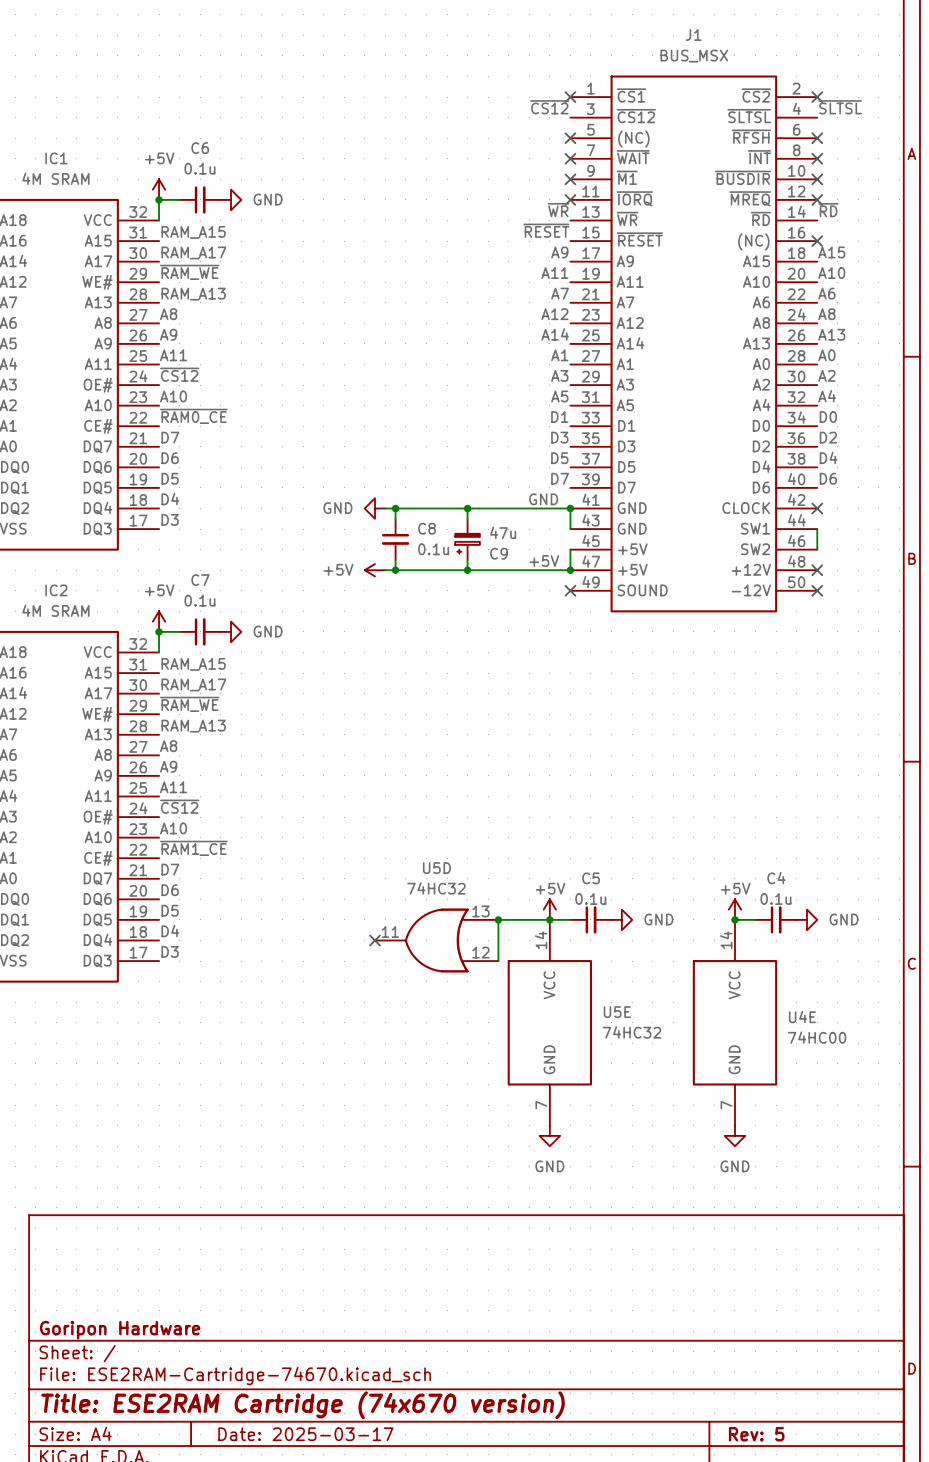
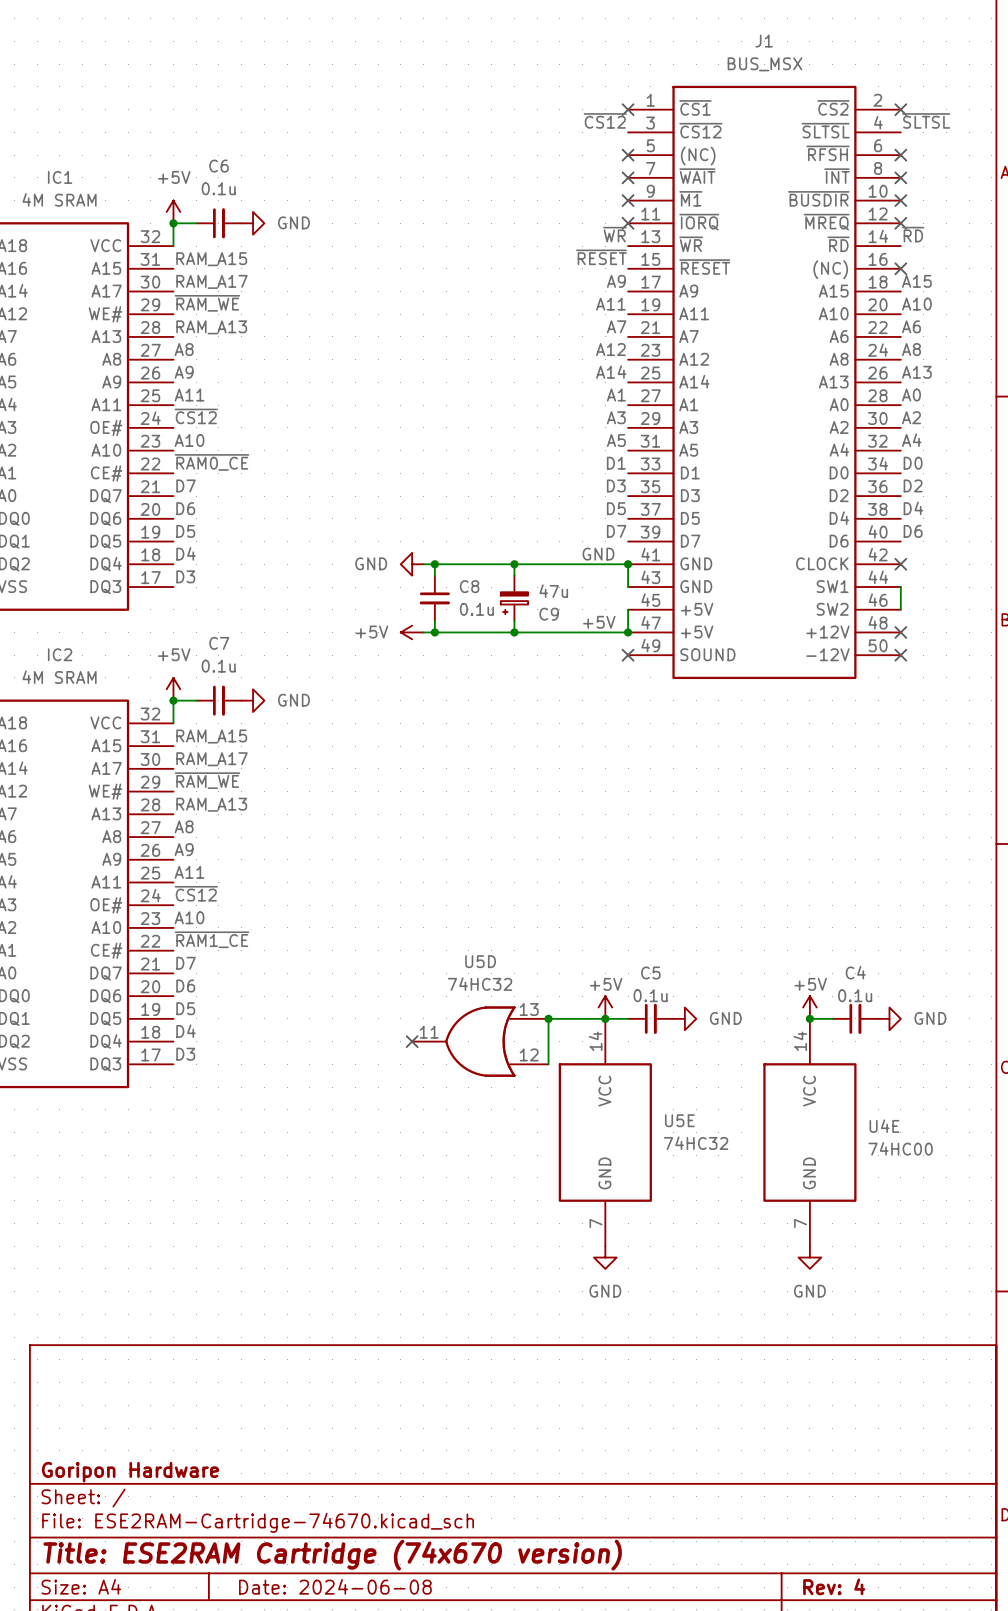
title block: Date: 2025-03-17 (305, 1434) -> Date: 2024-06-08 (335, 1586)
title block: Rev: 5 (756, 1434) -> Rev: 4 (834, 1586)

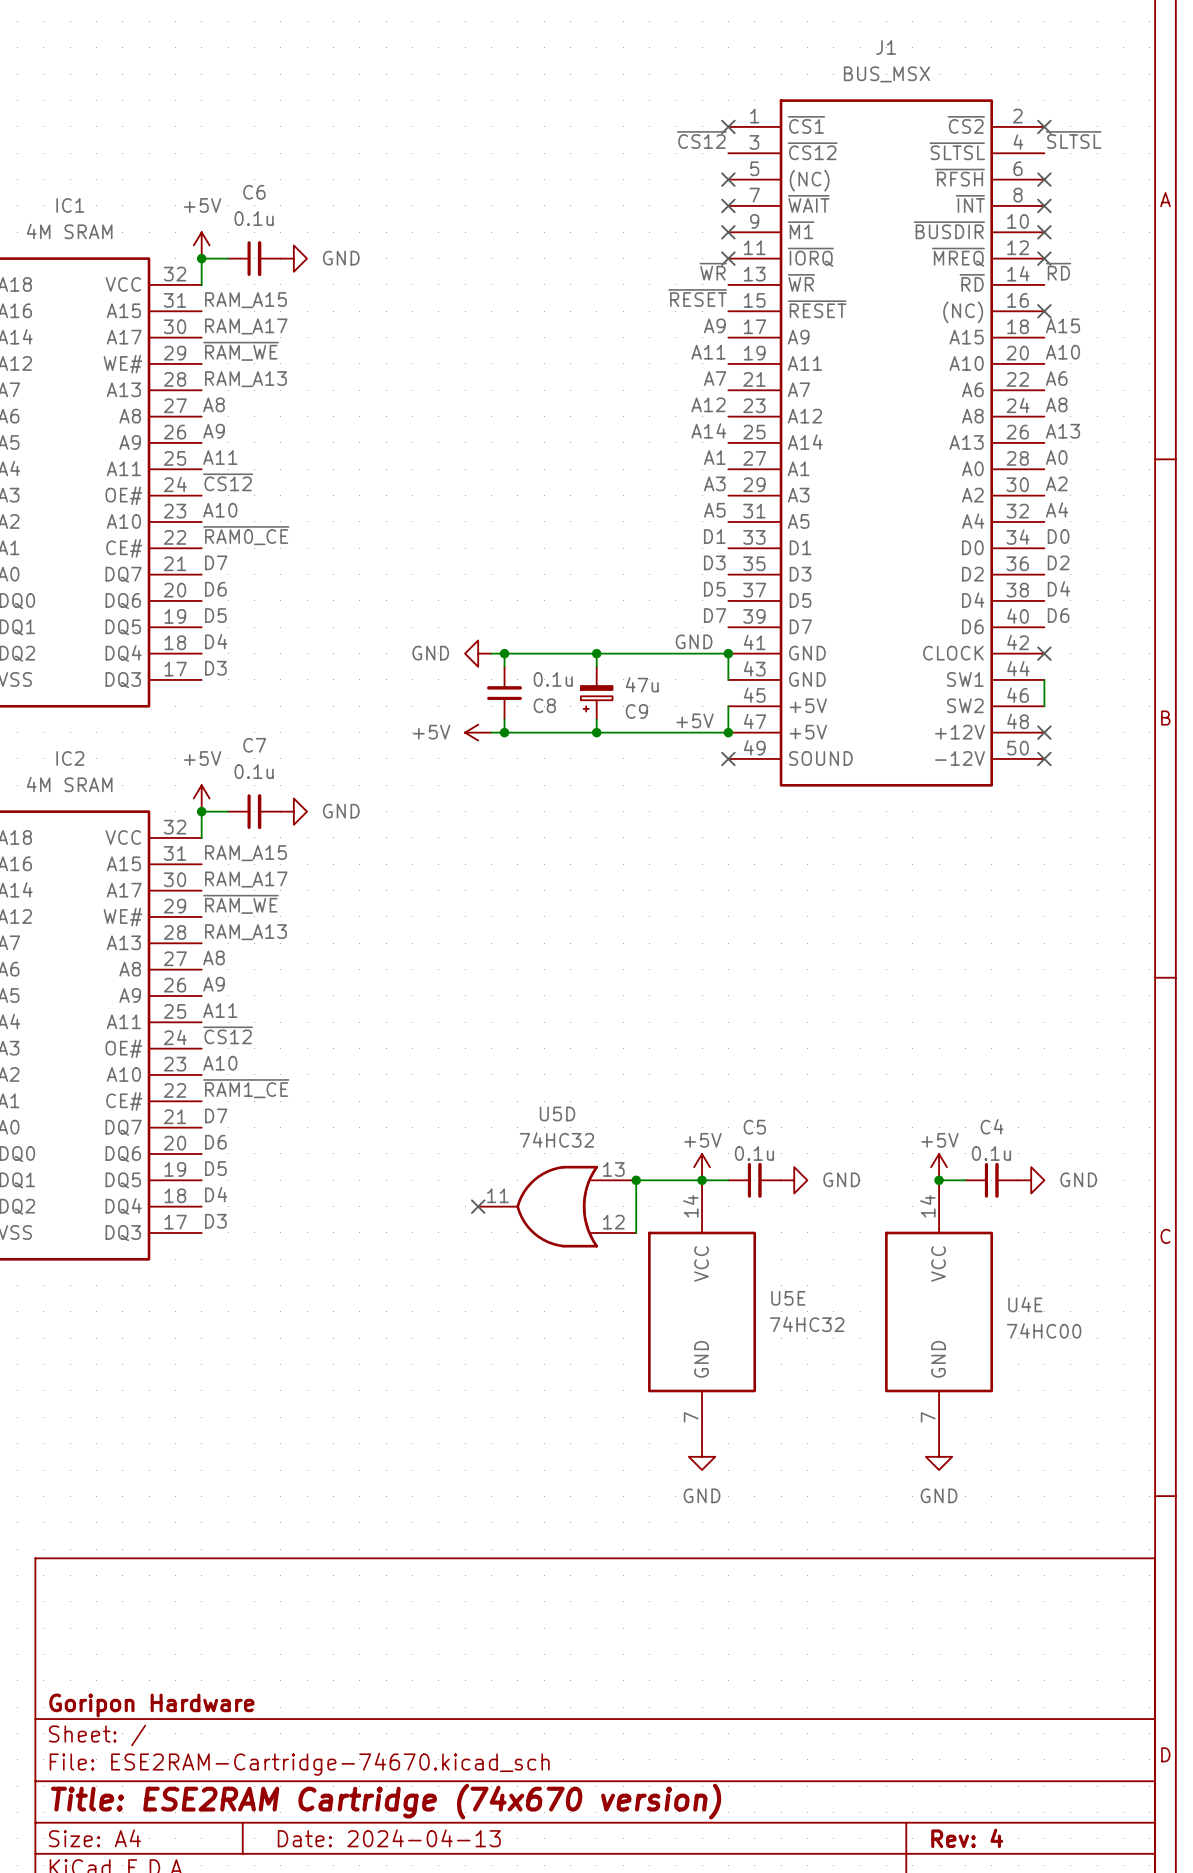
C8 name position: C8 (469, 586) -> C8 (544, 705)
C8 rotation: 0° (434, 598) -> 180° (504, 693)
C8 value position: 0.1u (476, 609) -> 0.1u (553, 679)
title block: Date: 2024-06-08 (335, 1586) -> Date: 2024-04-13 (389, 1838)

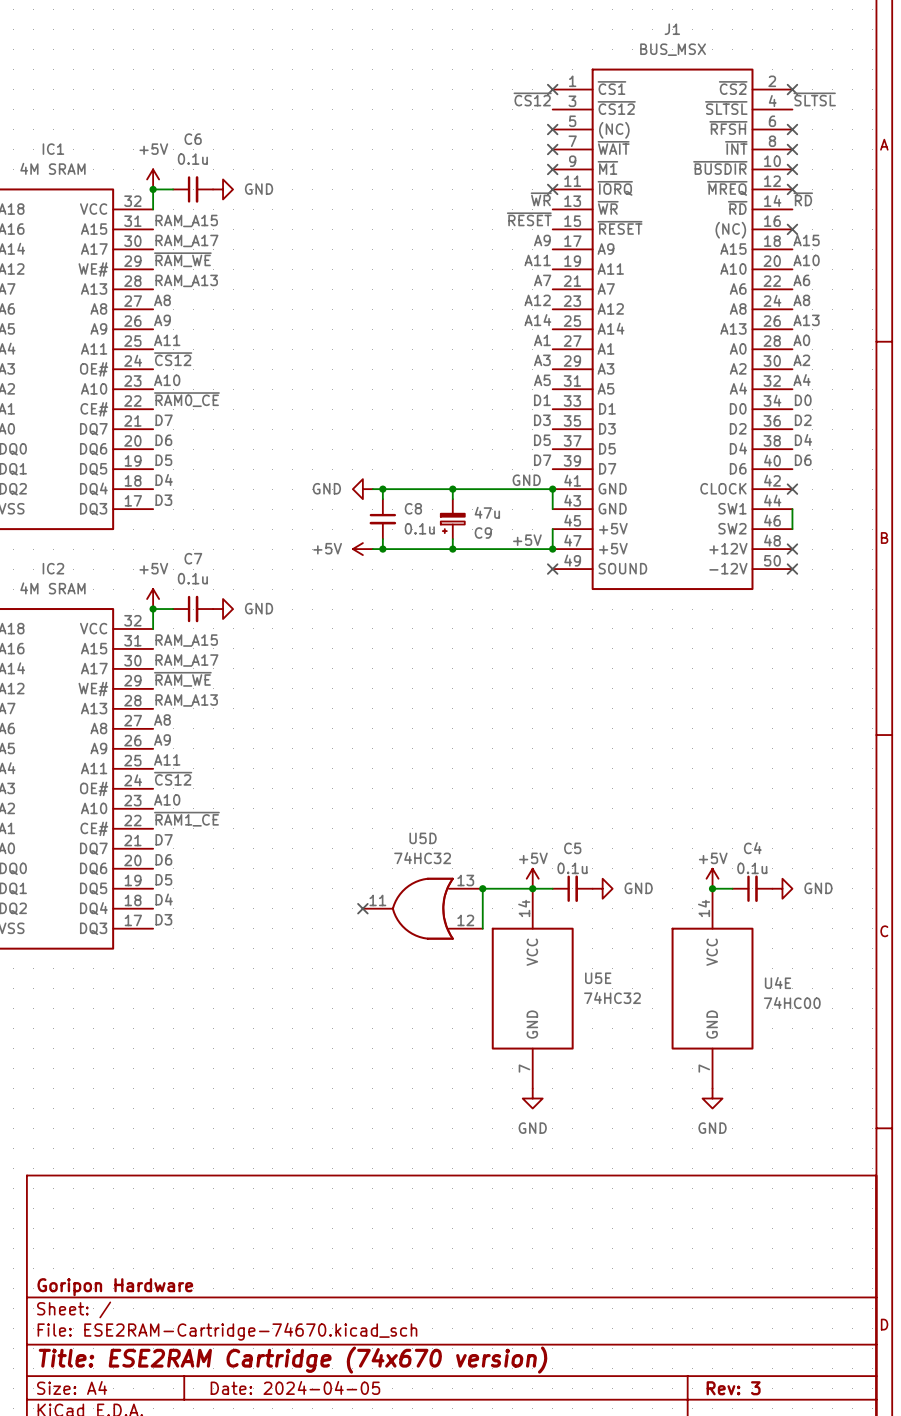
C8 value position: 0.1u (553, 679) -> 0.1u (419, 528)
C8 rotation: 0° (504, 693) -> 180° (382, 519)
C8 name position: C8 (544, 705) -> C8 (413, 508)
title block: Date: 2024-04-13 (389, 1838) -> Date: 2024-04-05 (295, 1387)
title block: Rev: 4 (967, 1838) -> Rev: 3 (733, 1388)

